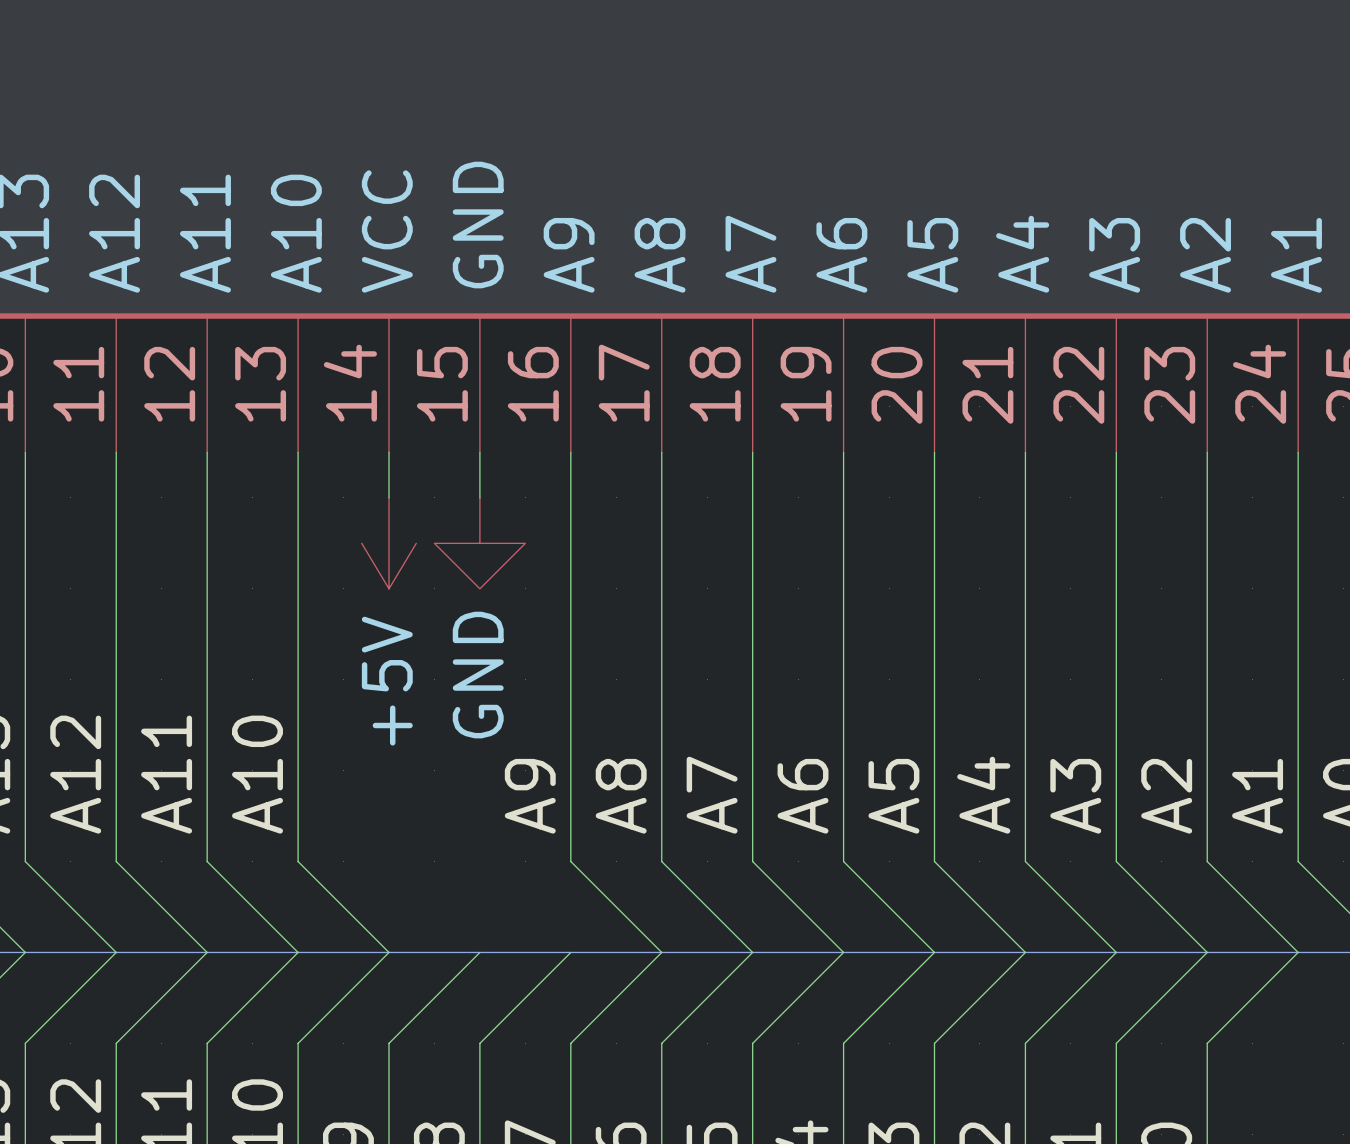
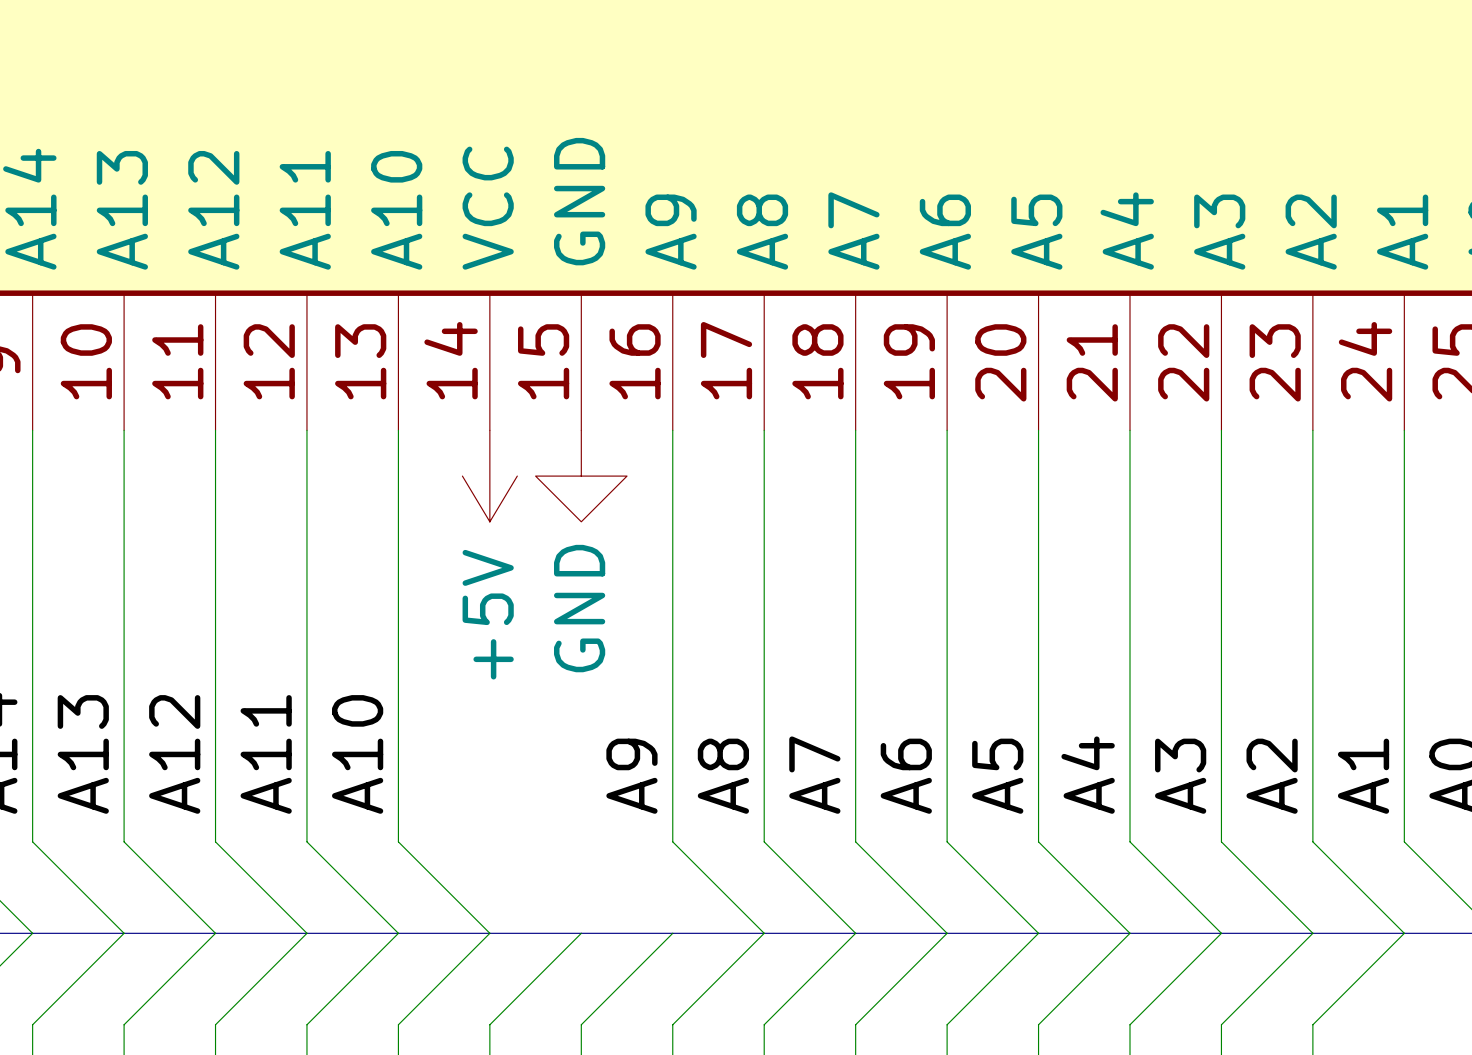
power symbol position: +5V (389, 543) -> +5V (489, 476)
power symbol position: GND (479, 543) -> GND (581, 476)

